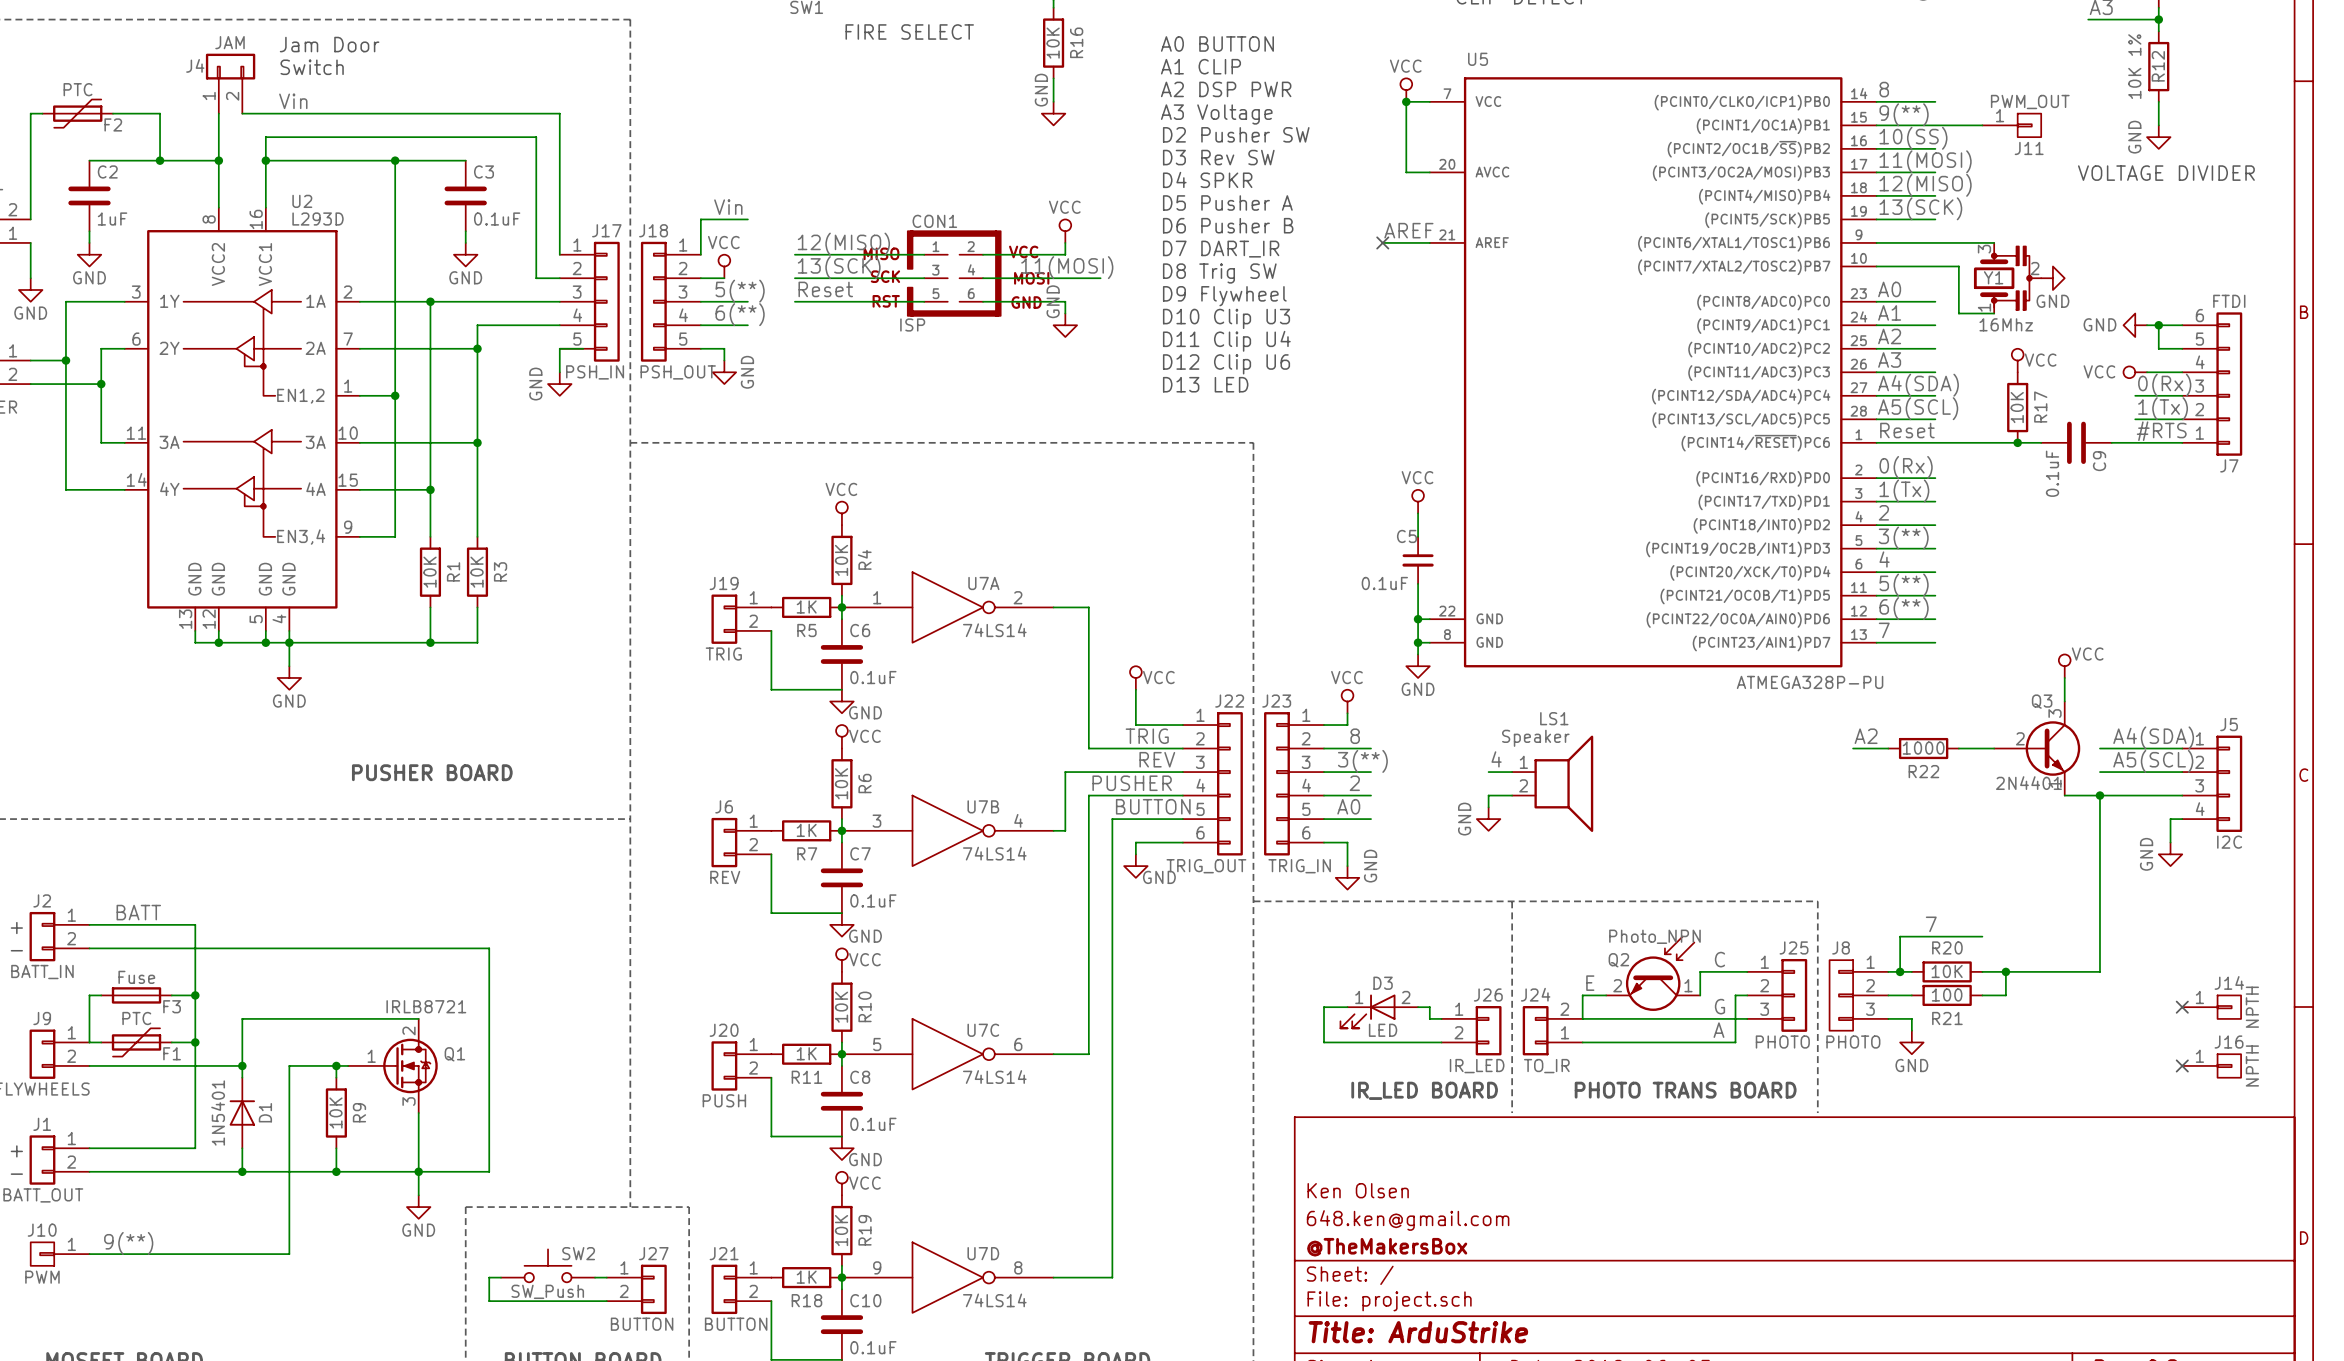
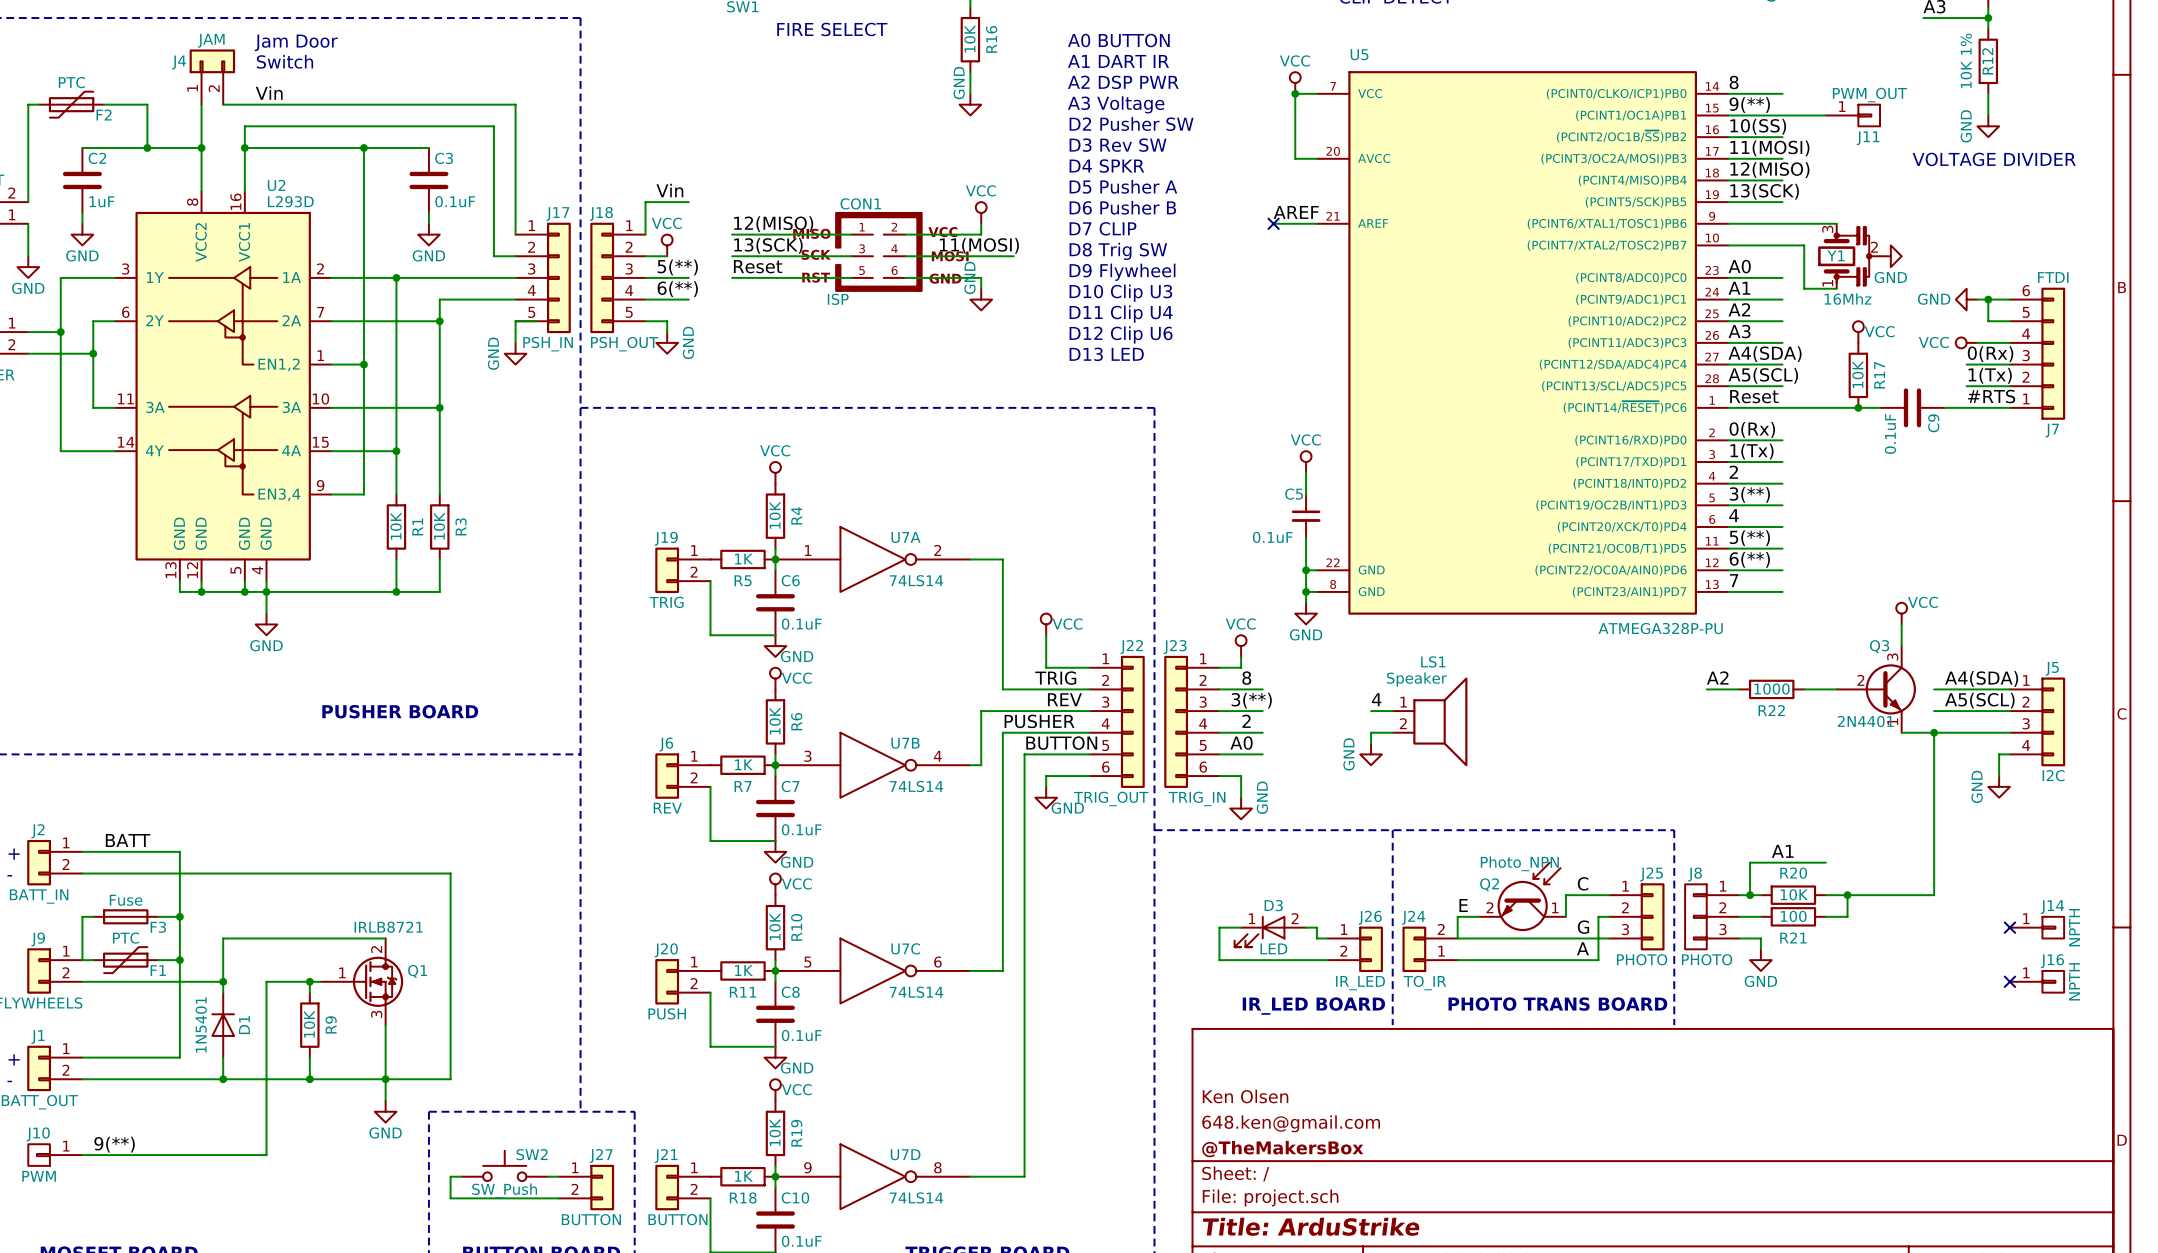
text: A1 CLIP (1200, 66) -> A1 DART IR (1118, 61)
text: D7 DART_IR (1221, 249) -> D7 CLIP (1102, 228)
label: 7 (1931, 924) -> A1 (1782, 851)

